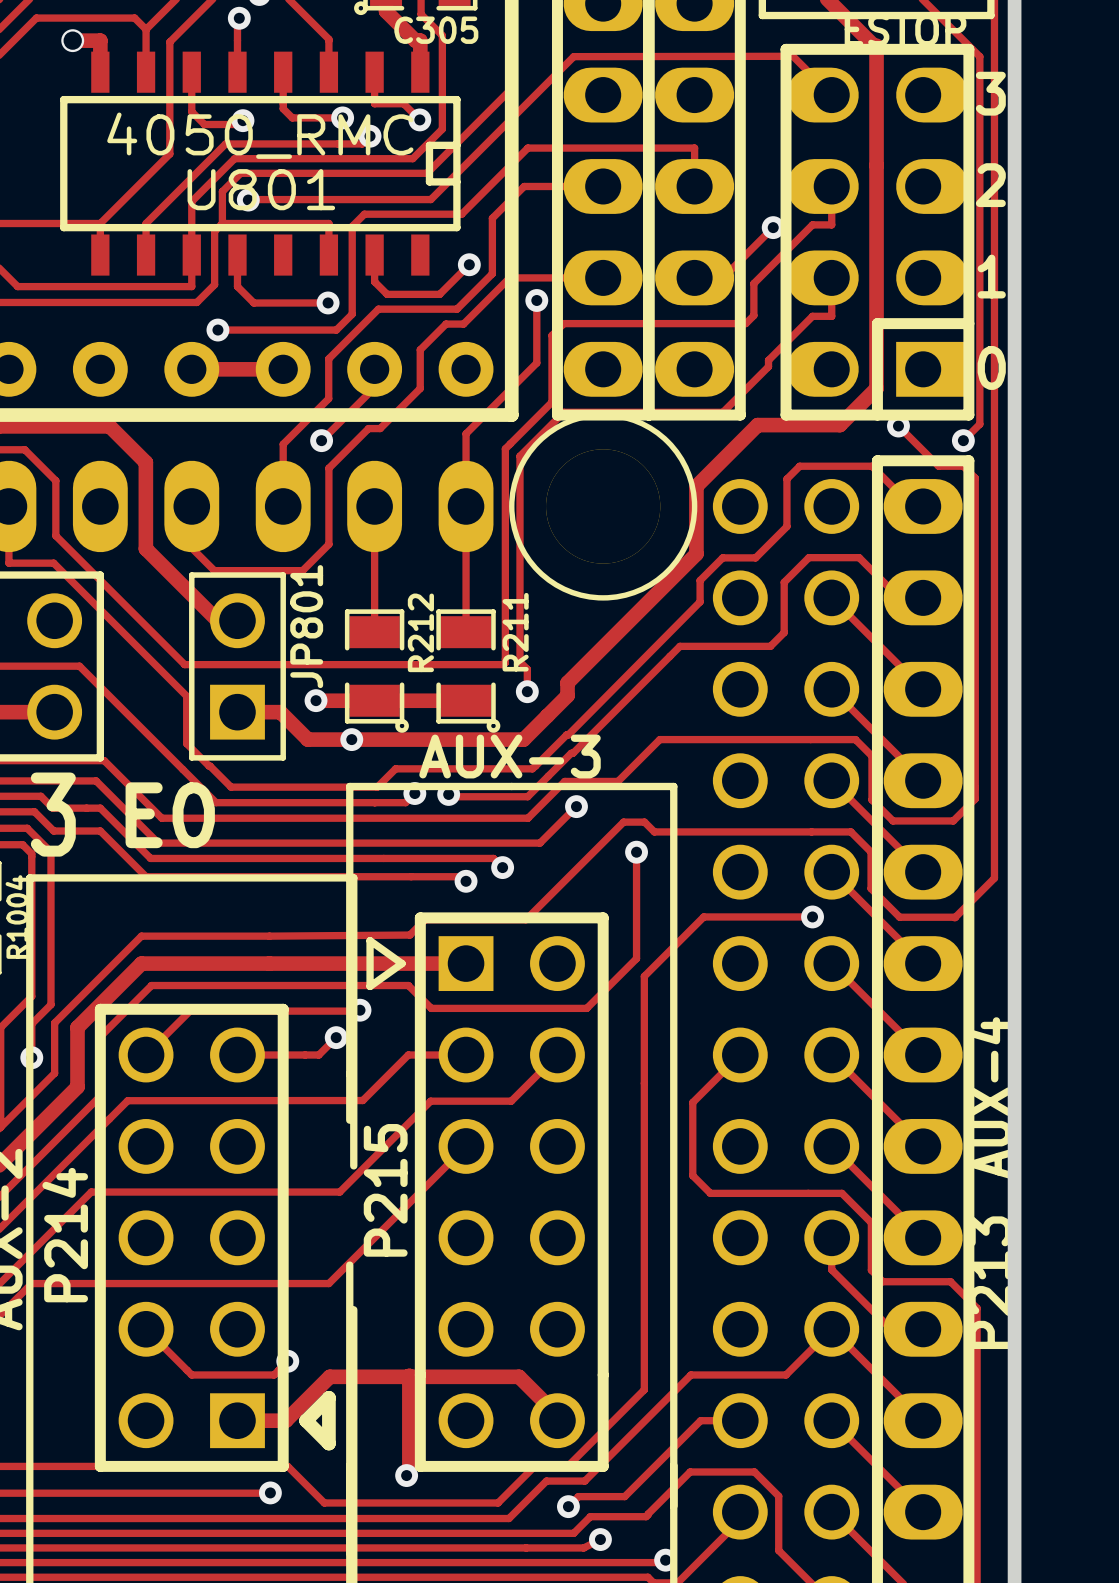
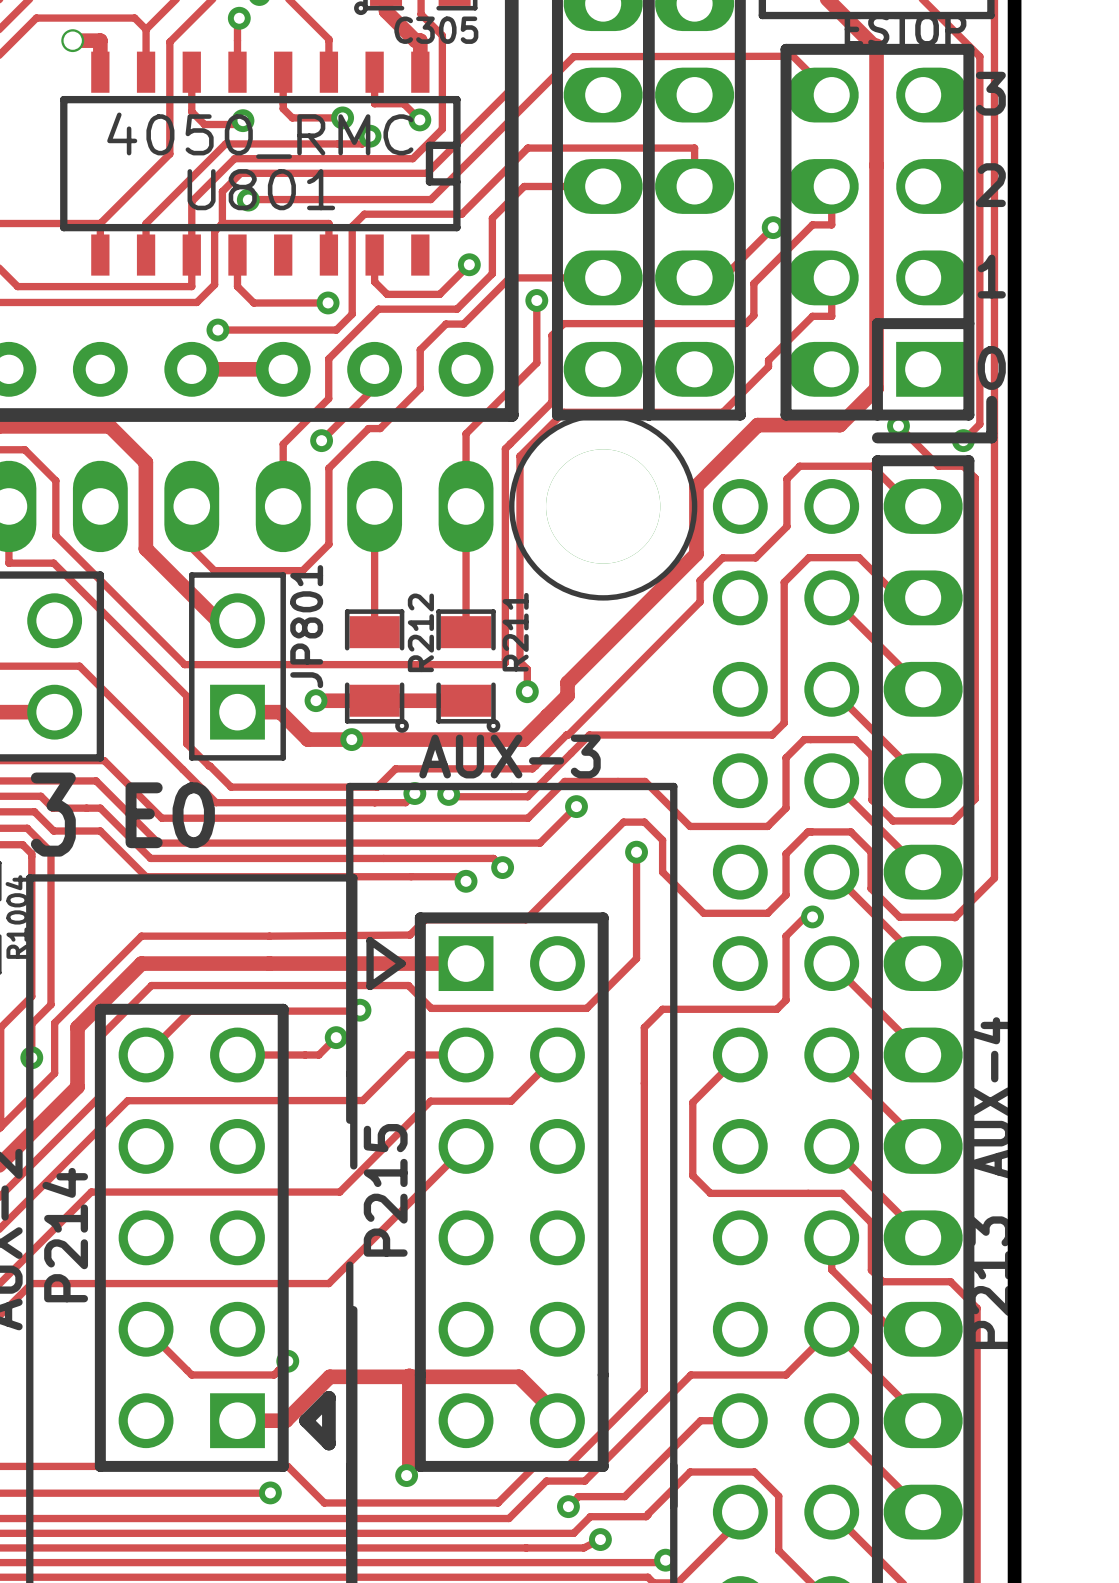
line: none -> (991, 401) (991, 437) (877, 437)
track: (784, 632) (770, 646) (679, 646) (571, 753) -> (784, 632) (784, 723) (772, 735) (589, 735) (571, 753)
track: (804, 739) (659, 739) (618, 781) -> (804, 739) (786, 757) (786, 808) (767, 826) (690, 826) (645, 781) (618, 781)
track: (654, 831) (807, 831) -> (654, 831) (662, 840) (662, 872) (703, 913) (767, 913) (786, 895) (786, 853) (807, 831)
track: (805, 916) (703, 916) (644, 976) (644, 1027) -> (805, 916) (786, 936) (786, 1000) (776, 1009) (662, 1009) (644, 1027)

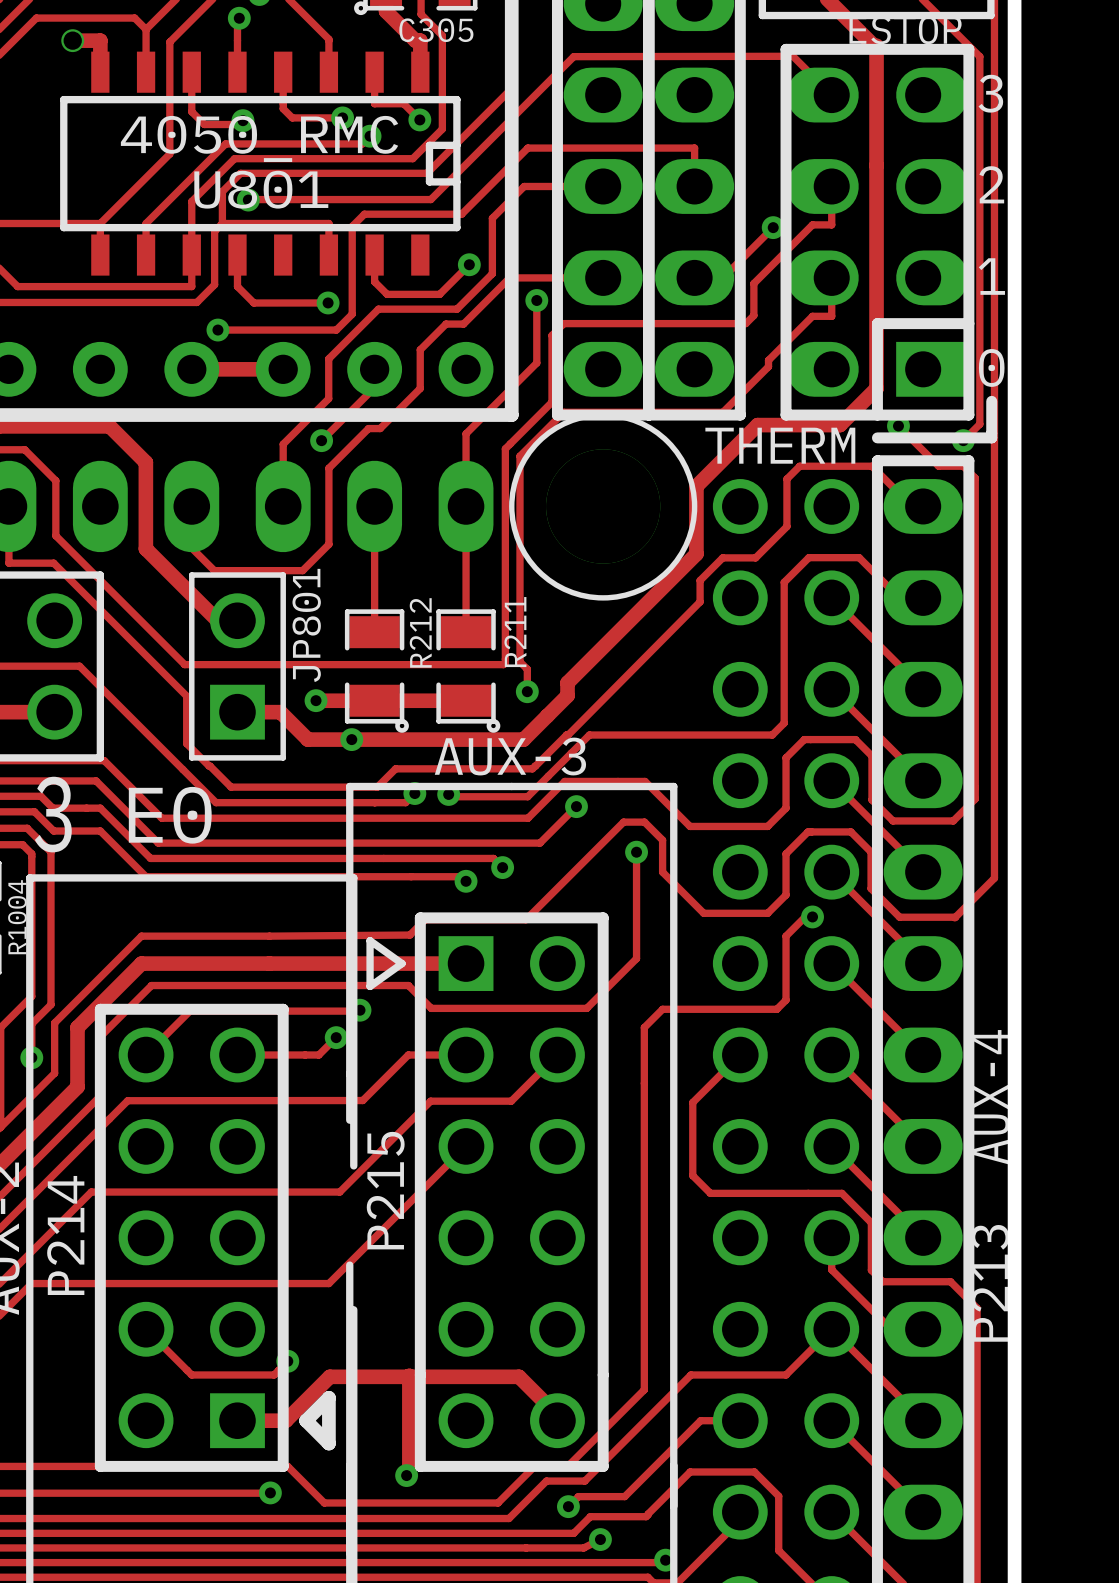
text: none -> THERM (780, 445)

